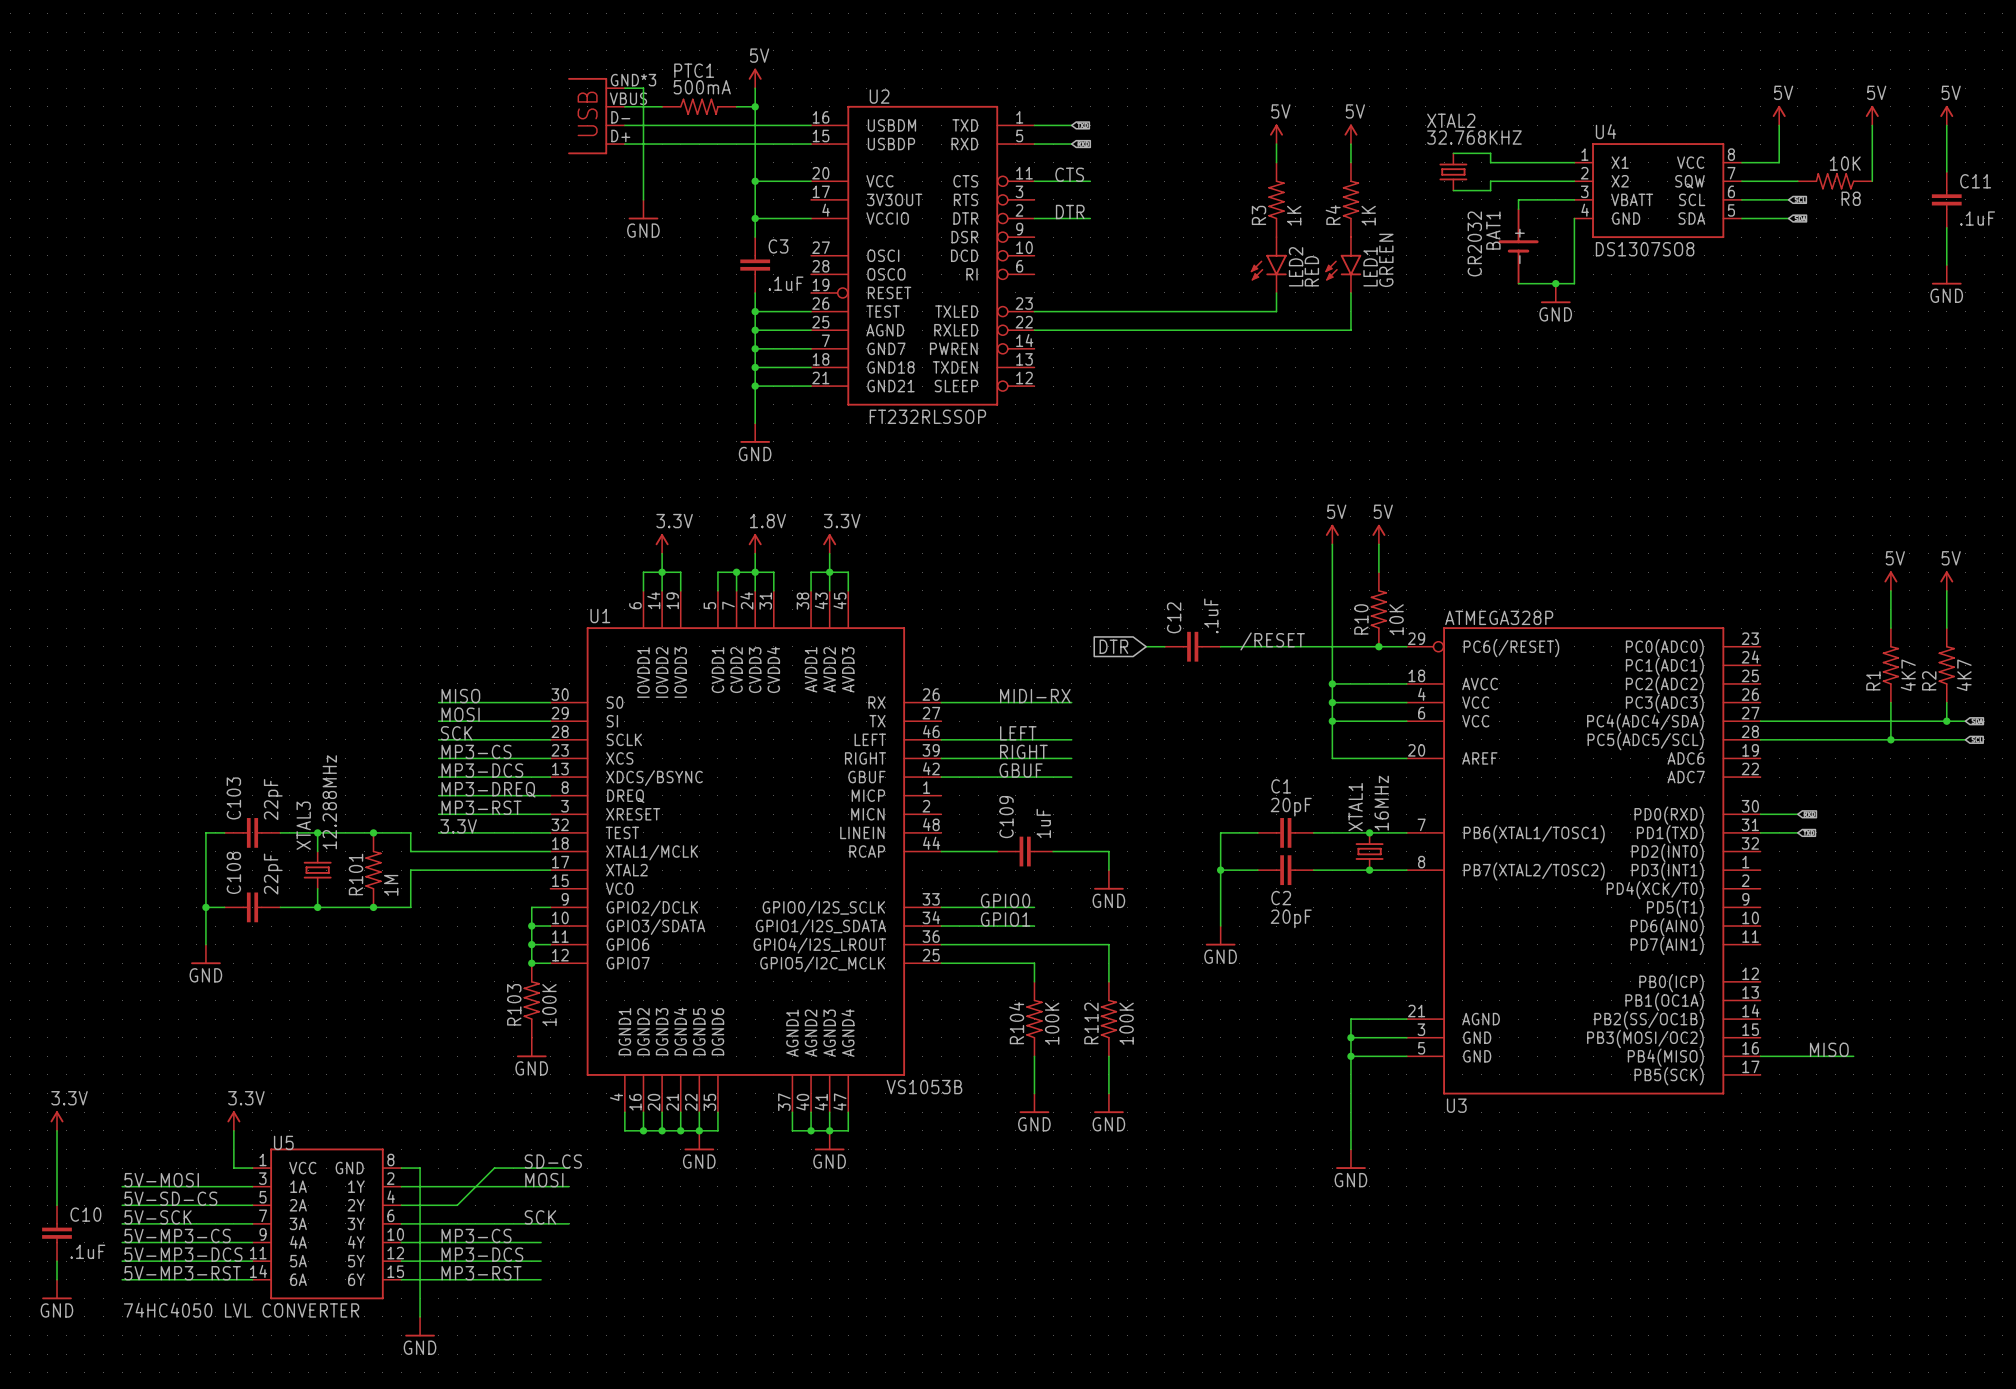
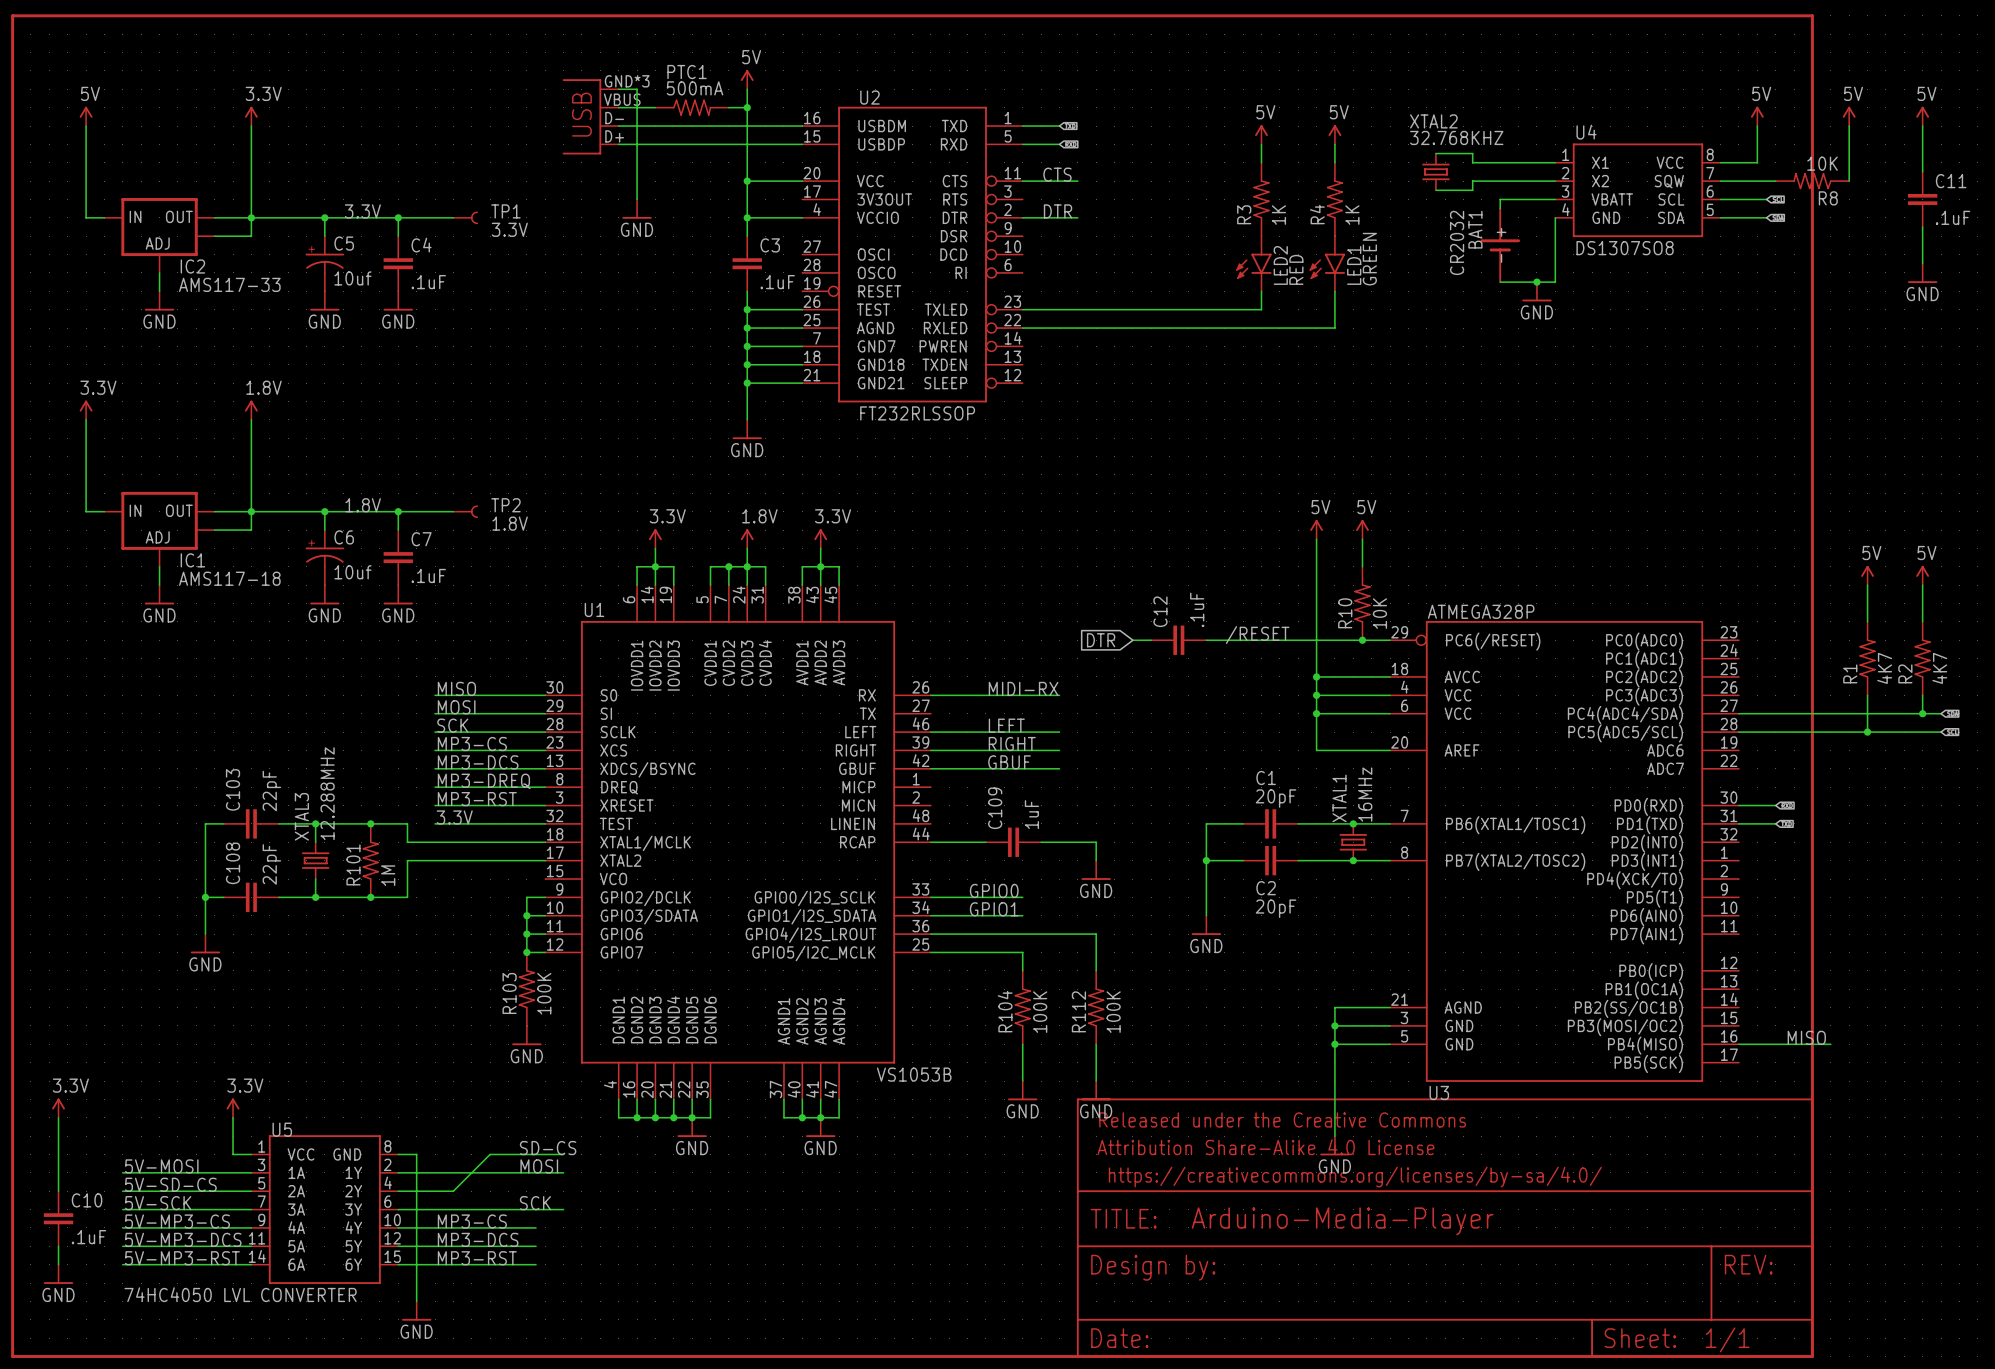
power symbol: none -> 5V (86, 116)
power symbol: none -> 3.3V (251, 116)
wire: none -> (86, 126) (86, 217) (104, 217)
wire: none -> (251, 126) (251, 236) (214, 236)
label: none -> 3.3V (362, 211)
wire: none -> (214, 217) (453, 217)
junction: none -> (251, 217)
wire: none -> (324, 217) (324, 236)
junction: none -> (324, 217)
wire: none -> (398, 217) (398, 236)
junction: none -> (398, 217)
TP1: none -> 3.3V (465, 217)
IC2: none -> AMS117-33 (159, 235)
C5: none -> 10uf (324, 263)
C4: none -> .1uF (398, 263)
wire: none -> (159, 272) (159, 291)
power symbol: none -> GND (159, 300)
power symbol: none -> GND (324, 300)
power symbol: none -> GND (398, 300)
power symbol: none -> 3.3V (86, 410)
power symbol: none -> 1.8V (251, 410)
wire: none -> (86, 419) (86, 511) (104, 511)
wire: none -> (251, 419) (251, 530) (214, 530)
label: none -> 1.8V (363, 505)
wire: none -> (214, 511) (453, 511)
junction: none -> (251, 511)
wire: none -> (324, 511) (324, 530)
junction: none -> (324, 511)
wire: none -> (398, 511) (398, 530)
junction: none -> (398, 511)
TP2: none -> 1.8V (465, 511)
IC1: none -> AMS117-18 (159, 529)
C6: none -> 10uf (324, 557)
C7: none -> .1uF (398, 557)
wire: none -> (159, 566) (159, 585)
power symbol: none -> GND (159, 594)
power symbol: none -> GND (324, 594)
power symbol: none -> GND (398, 594)
part: none -> (912, 686)
part: none -> (1445, 1227)

